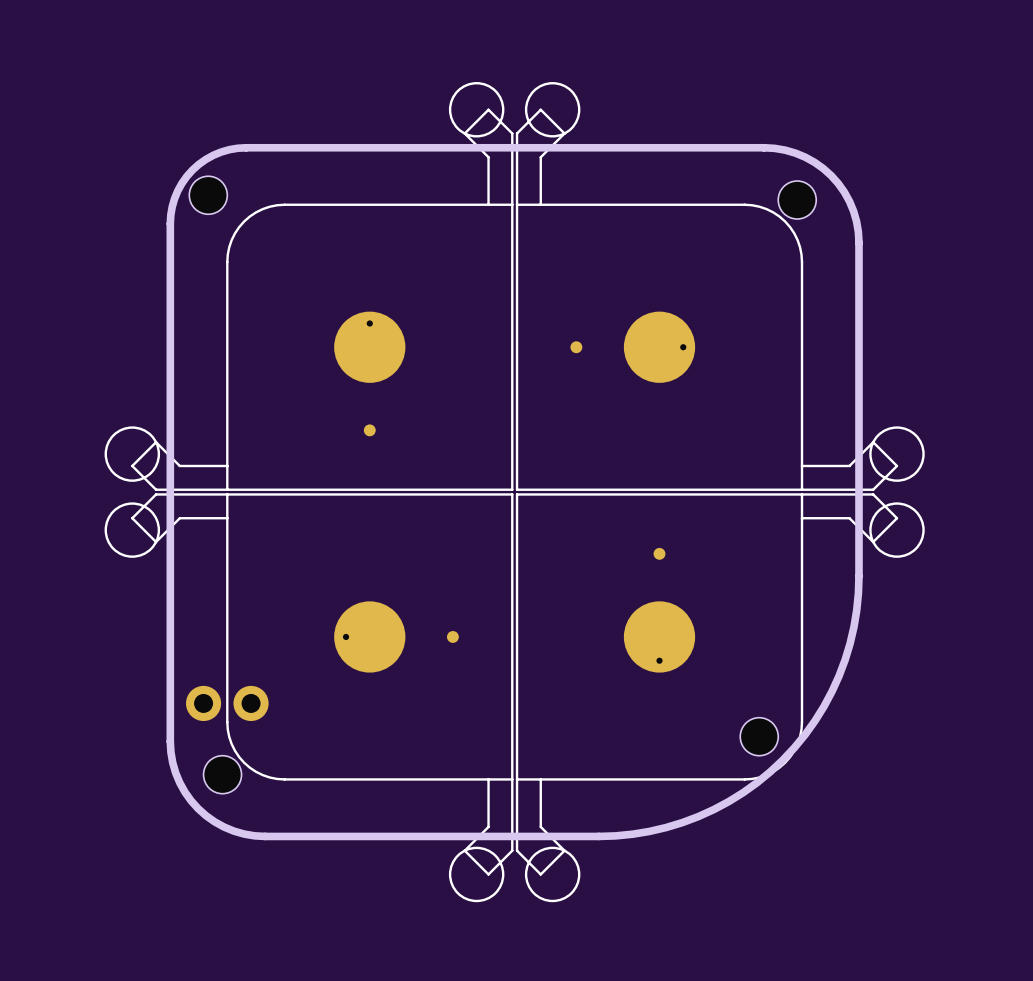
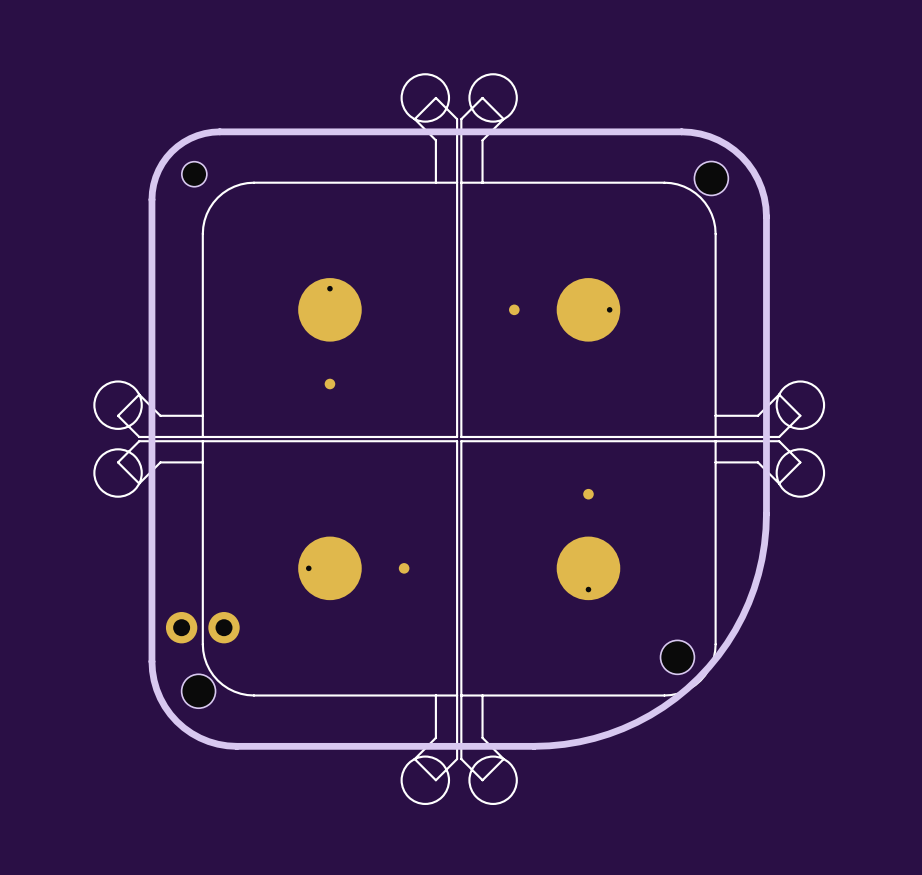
hole size: [189, 176, 228, 215] -> [181, 161, 207, 187]

